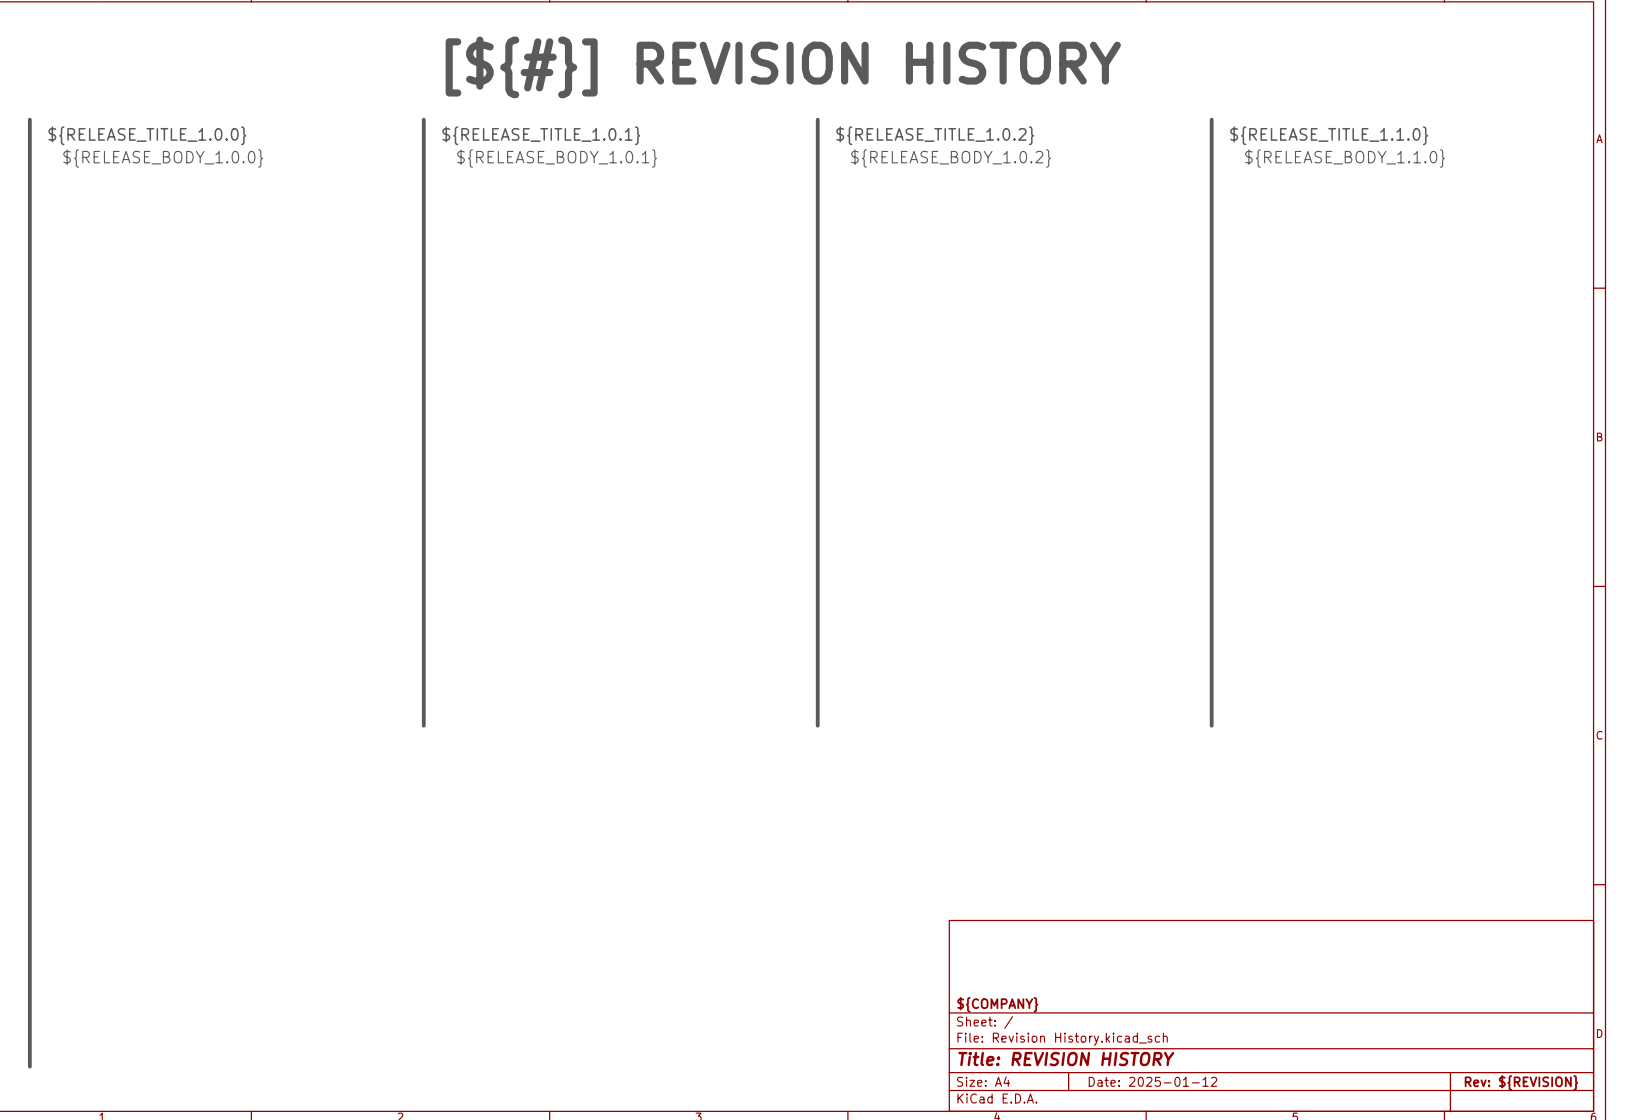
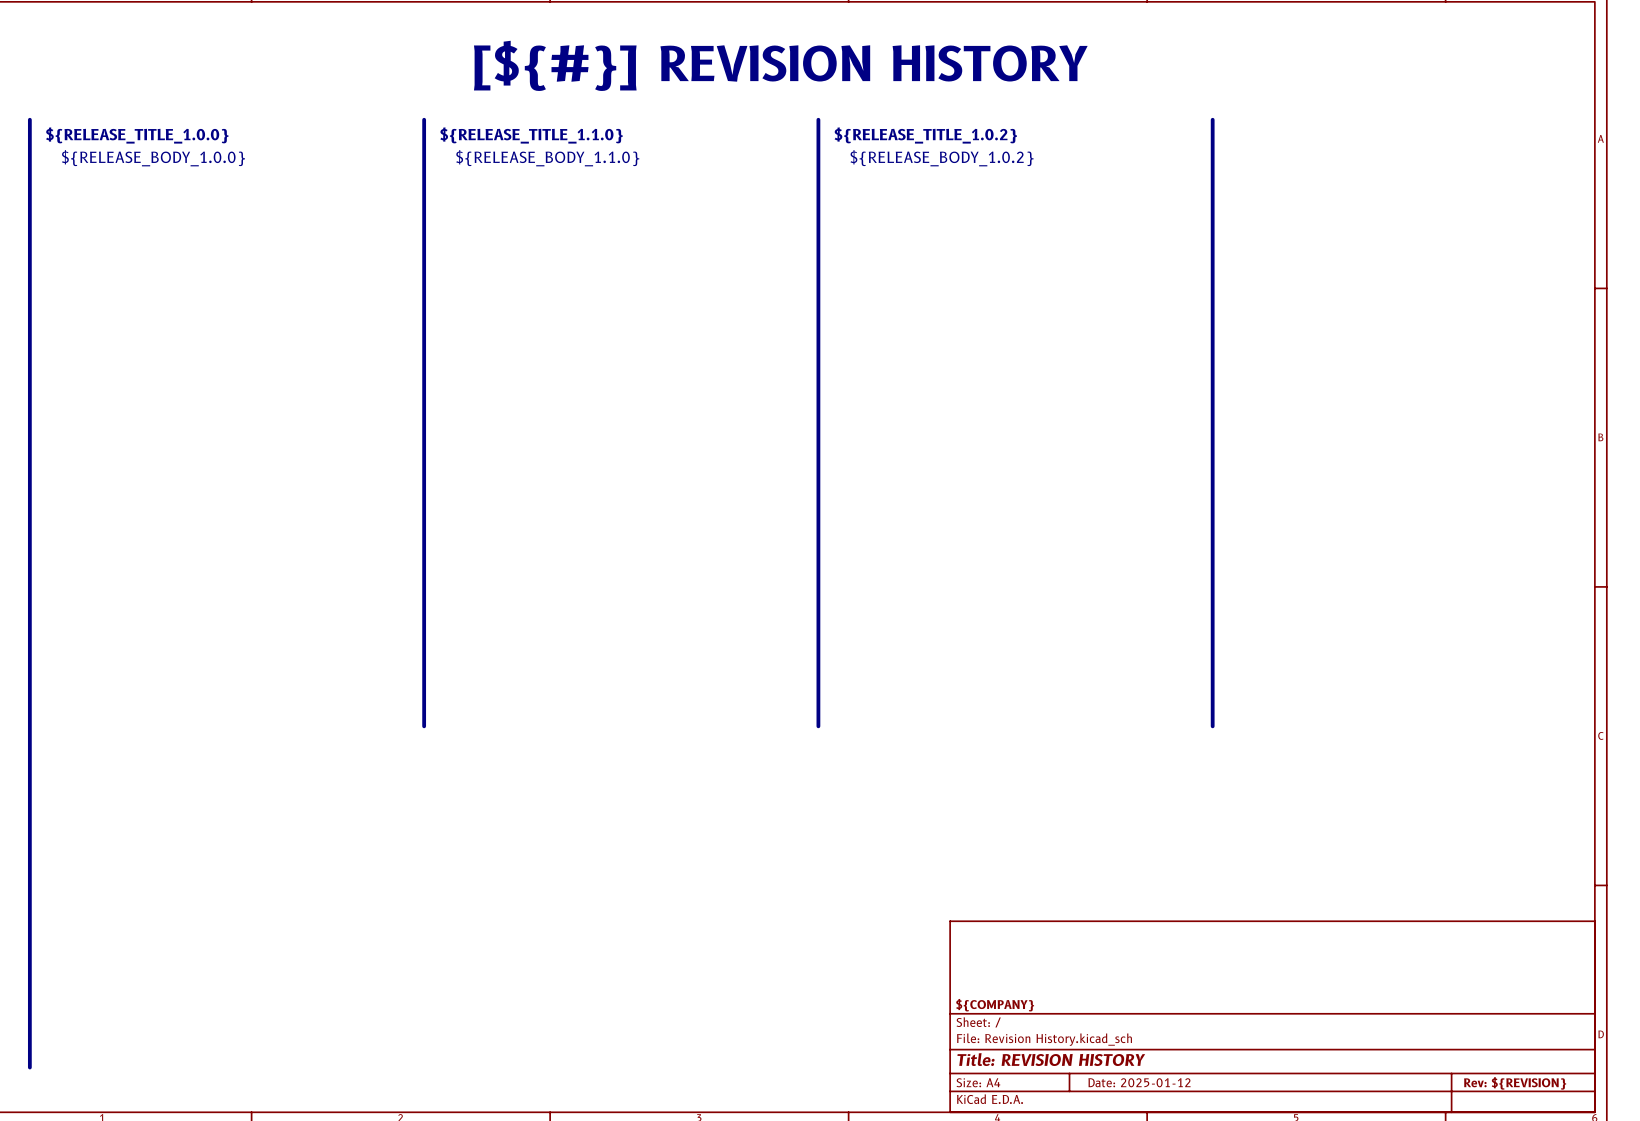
text: ${RELEASE_TITLE_1.0.1} (541, 135) -> ${RELEASE_TITLE_1.1.0} (531, 135)
text: ${RELEASE_TITLE_1.1.0} (1329, 135) -> none
text: ${RELEASE_BODY_1.0.1} (557, 158) -> ${RELEASE_BODY_1.1.0} (547, 158)
text: ${RELEASE_BODY_1.1.0} (1344, 158) -> none

